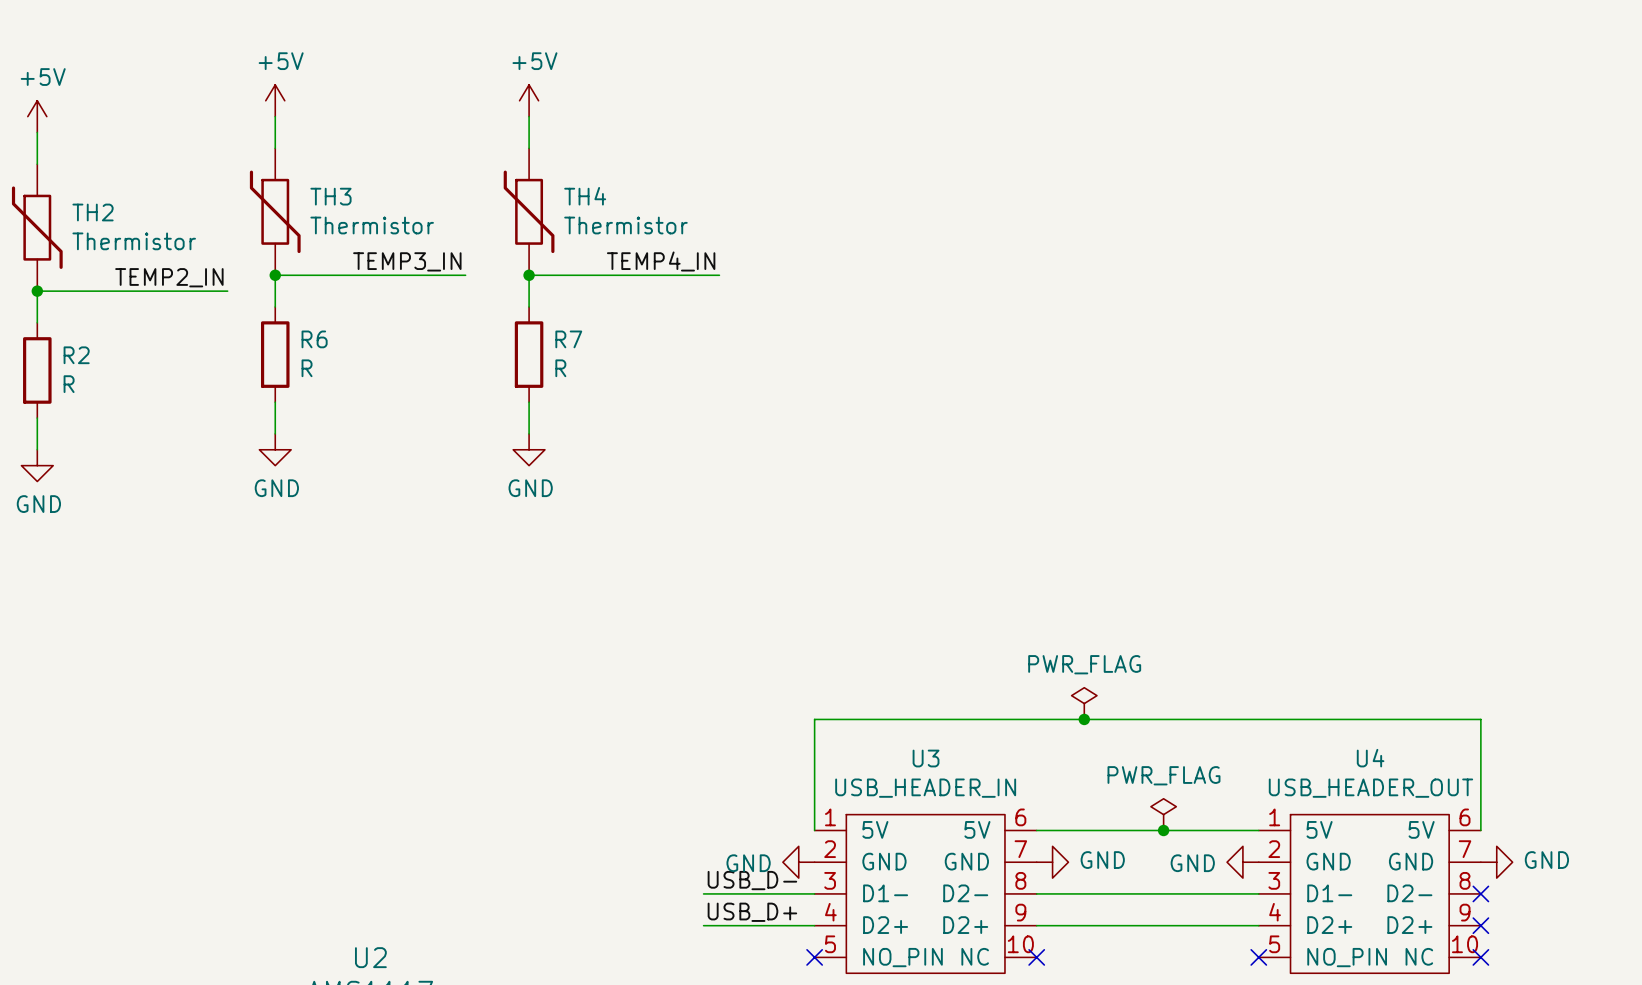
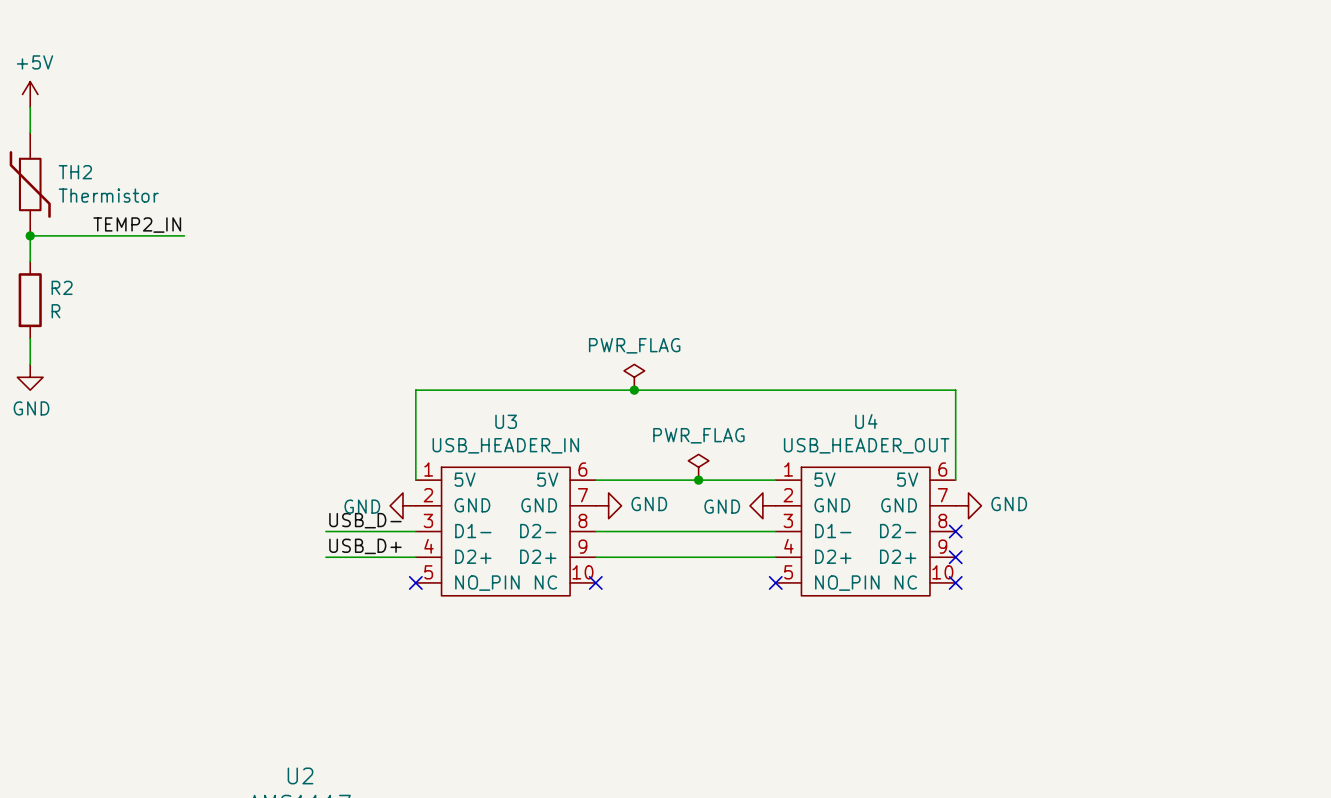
power symbol: +5V (275, 100) -> none
power symbol: +5V (529, 100) -> none
wire: (275, 116) (275, 148) -> none
wire: (529, 116) (529, 148) -> none
TH3: Thermistor (275, 211) -> none
TH4: Thermistor (529, 211) -> none
label: TEMP3_IN (407, 261) -> none
label: TEMP4_IN (661, 261) -> none
junction: (275, 275) -> none
wire: (465, 275) (275, 275) (275, 307) -> none
junction: (529, 275) -> none
wire: (719, 275) (529, 275) (529, 307) -> none
R6: R (275, 354) -> none
R7: R (529, 354) -> none
wire: (275, 402) (275, 433) -> none
wire: (529, 402) (529, 433) -> none
power symbol: GND (275, 449) -> none
power symbol: GND (529, 449) -> none
power symbol: none -> PWR_FLAG (634, 377)
junction: none -> (634, 390)
power symbol: none -> PWR_FLAG (698, 467)
wire: none -> (415, 480) (415, 390) (955, 390) (955, 480)
wire: none -> (595, 480) (775, 480)
junction: none -> (698, 480)
power symbol: none -> GND (402, 505)
power symbol: none -> GND (608, 505)
power symbol: none -> GND (762, 505)
power symbol: none -> GND (968, 505)
label: none -> USB_D- (365, 520)
wire: none -> (325, 531) (415, 531)
wire: none -> (595, 531) (775, 531)
no-connect mark: none -> (955, 531)
label: none -> USB_D+ (365, 546)
wire: none -> (325, 557) (415, 557)
wire: none -> (595, 557) (775, 557)
no-connect mark: none -> (955, 557)
power symbol: PWR_FLAG (1084, 703) -> none
no-connect mark: none -> (415, 582)
no-connect mark: none -> (595, 582)
no-connect mark: none -> (775, 582)
junction: (1084, 719) -> none
no-connect mark: none -> (955, 582)
power symbol: PWR_FLAG (1163, 814) -> none
wire: (814, 830) (814, 719) (1480, 719) (1480, 830) -> none
wire: (1036, 830) (1258, 830) -> none
junction: (1163, 830) -> none
power symbol: GND (798, 862) -> none
power symbol: GND (1052, 862) -> none
power symbol: GND (1242, 862) -> none
power symbol: GND (1496, 862) -> none
label: USB_D- (752, 880) -> none
wire: (703, 893) (814, 893) -> none
U3 position: (925, 893) -> (505, 531)
wire: (1036, 893) (1258, 893) -> none
U4 position: (1369, 893) -> (865, 531)
no-connect mark: (1480, 893) -> none
label: USB_D+ (752, 912) -> none
wire: (703, 925) (814, 925) -> none
wire: (1036, 925) (1258, 925) -> none
no-connect mark: (1480, 925) -> none
no-connect mark: (814, 957) -> none
no-connect mark: (1036, 957) -> none
no-connect mark: (1258, 957) -> none
no-connect mark: (1480, 957) -> none

